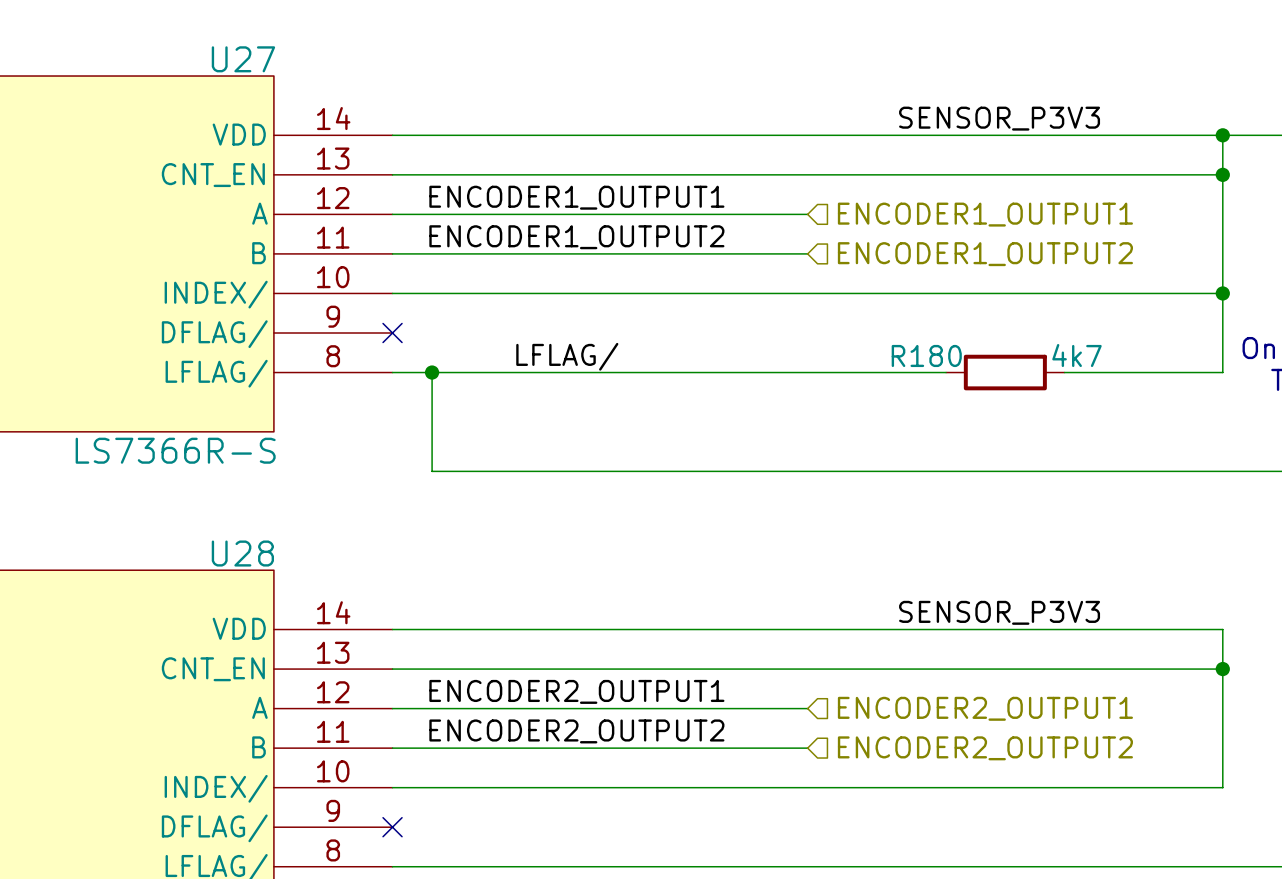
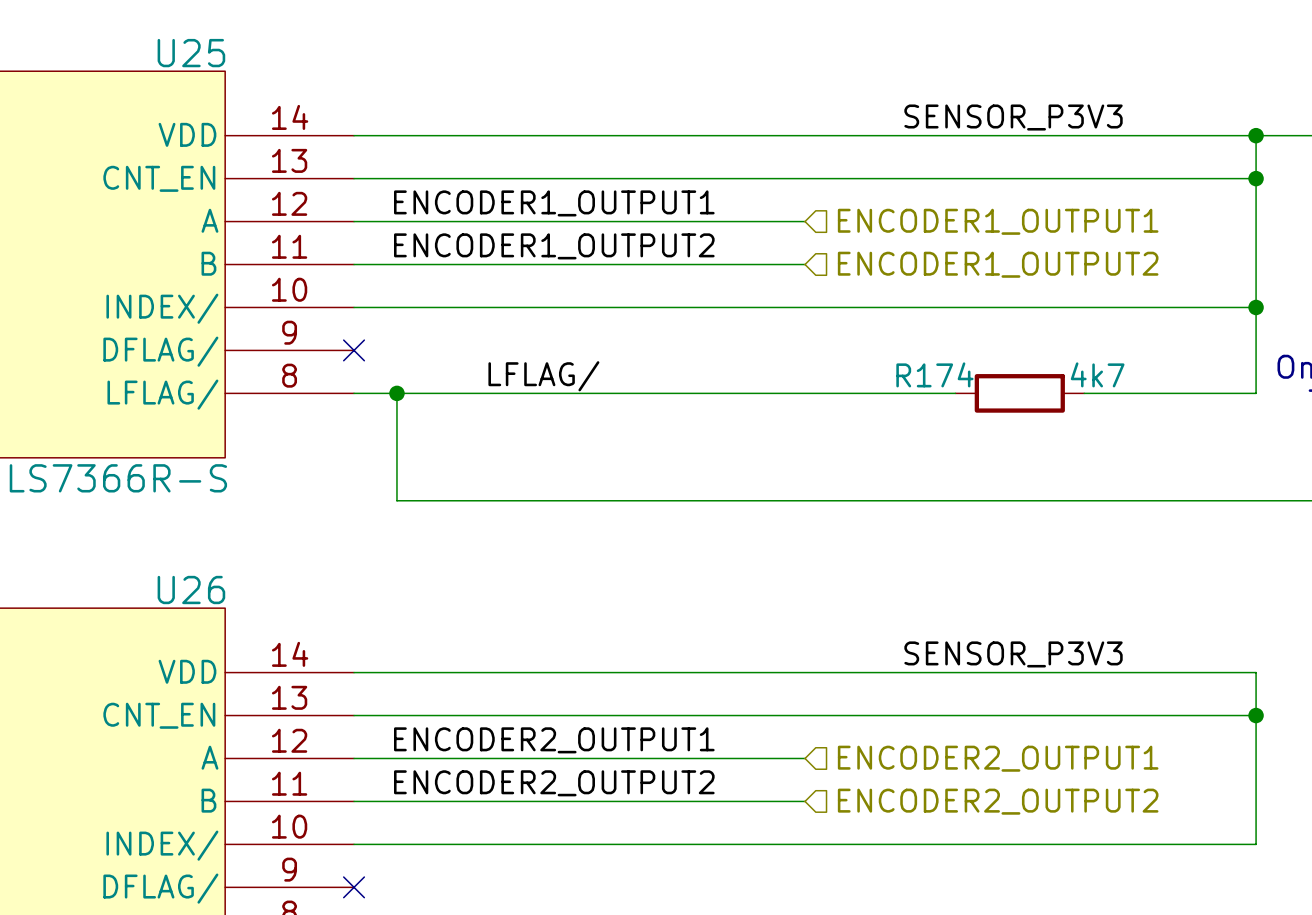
U27 name: U27 (243, 59) -> U25 (191, 53)
R180 name: R180 (926, 355) -> R174 (934, 374)
U28 name: U28 (242, 553) -> U26 (191, 590)

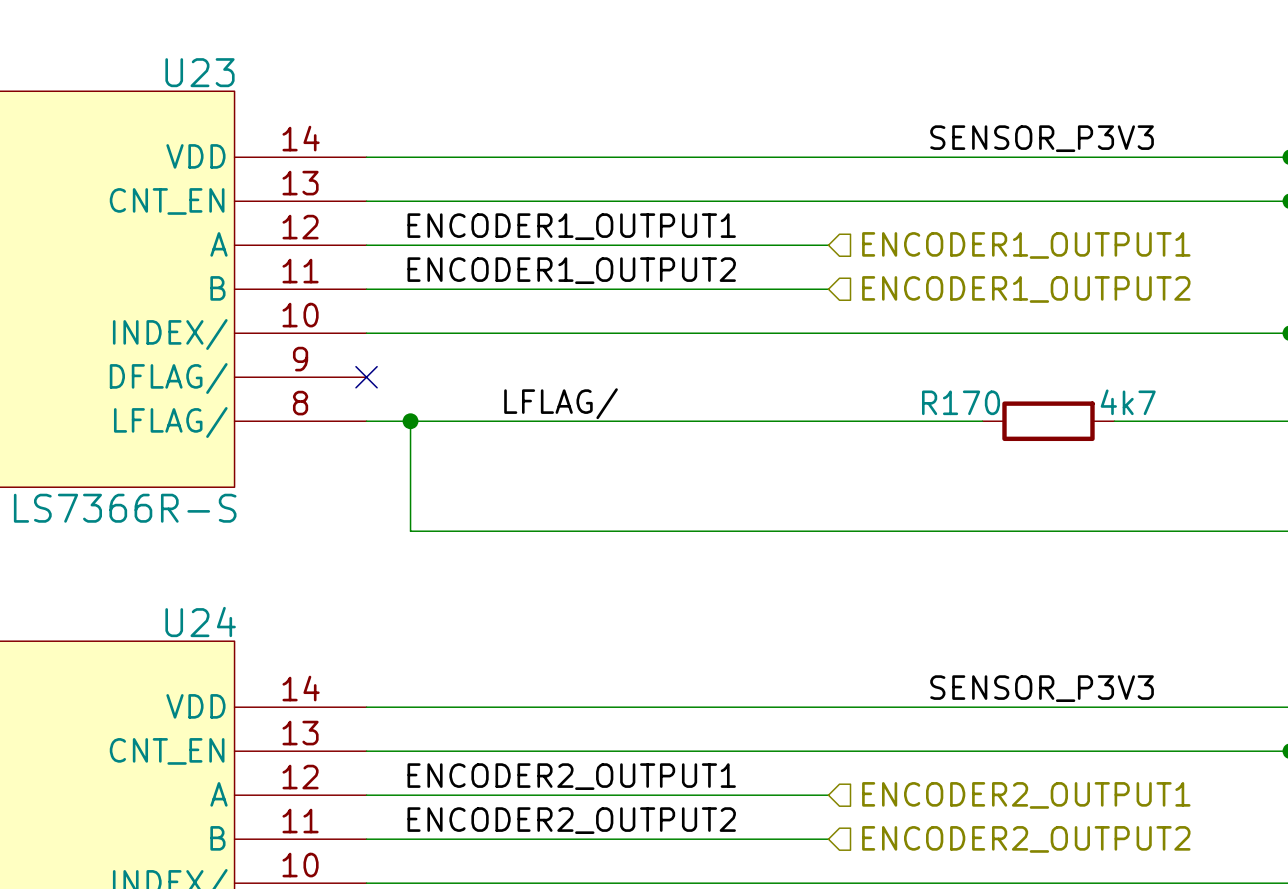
U25 name: U25 (191, 53) -> U23 (199, 72)
R174 name: R174 (934, 374) -> R170 (961, 402)
U26 name: U26 (191, 590) -> U24 (200, 621)

